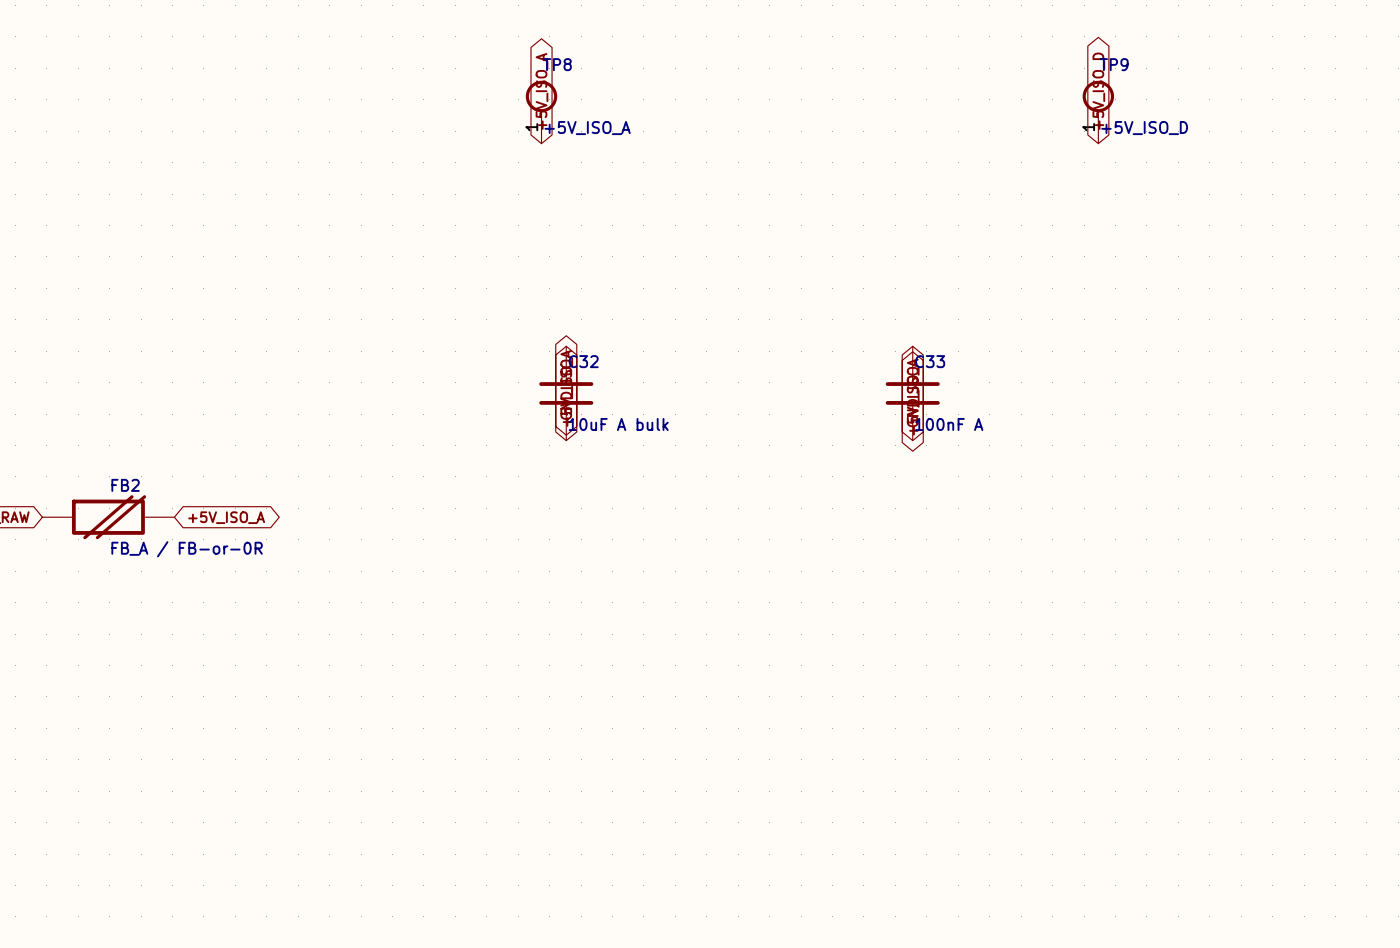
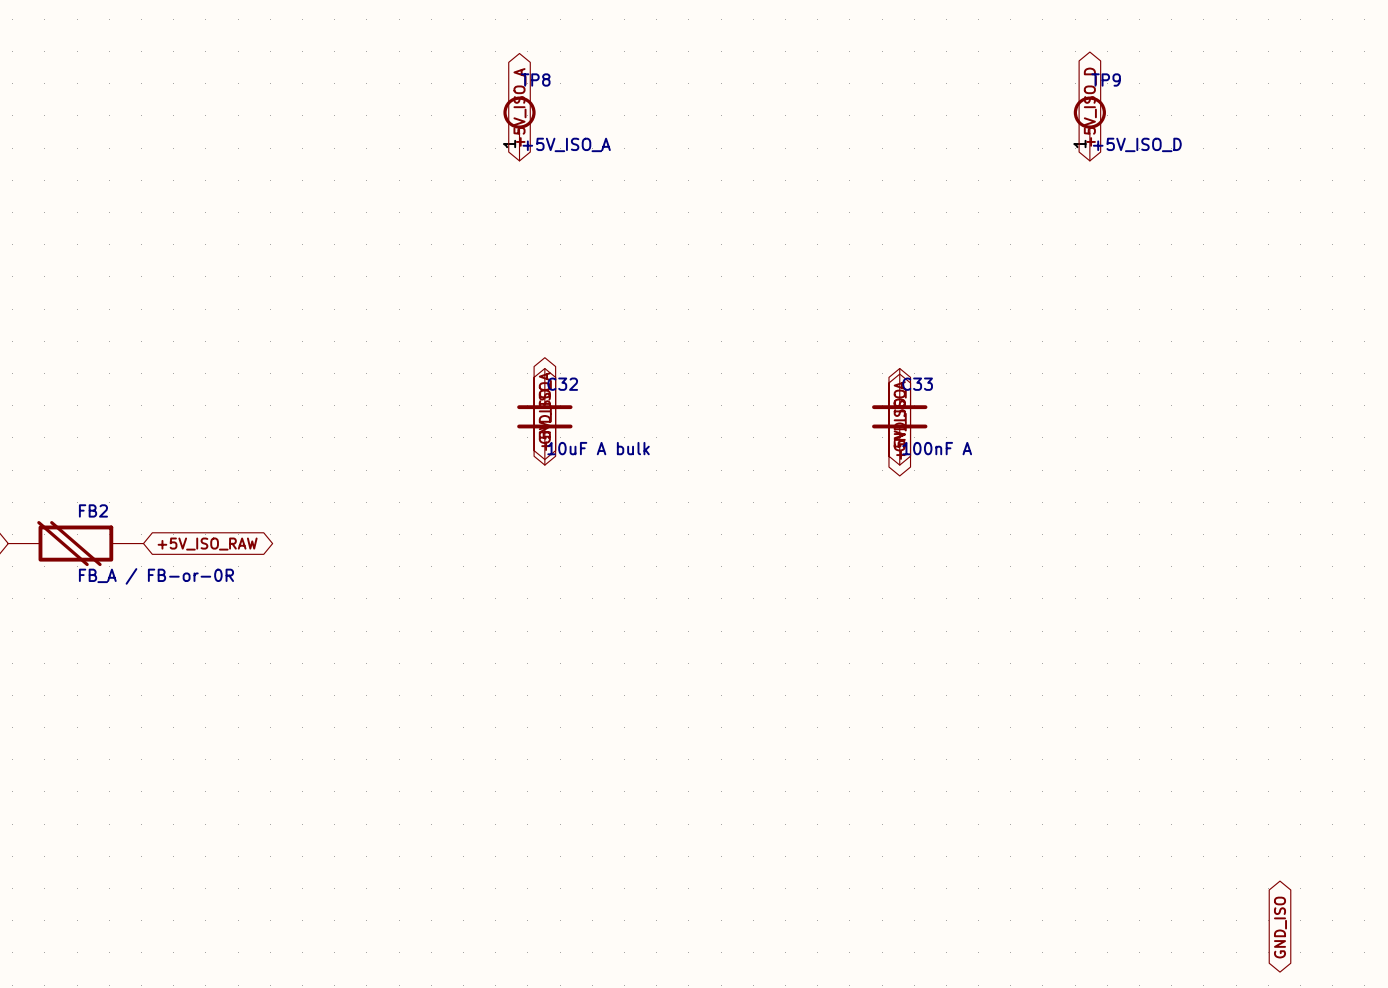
FB2 flip: as is (109, 517) -> left-right (75, 543)
global label: +5V_ISO_A (226, 517) -> +5V_ISO_RAW (207, 544)
global label: none -> GND_ISO (1280, 927)

